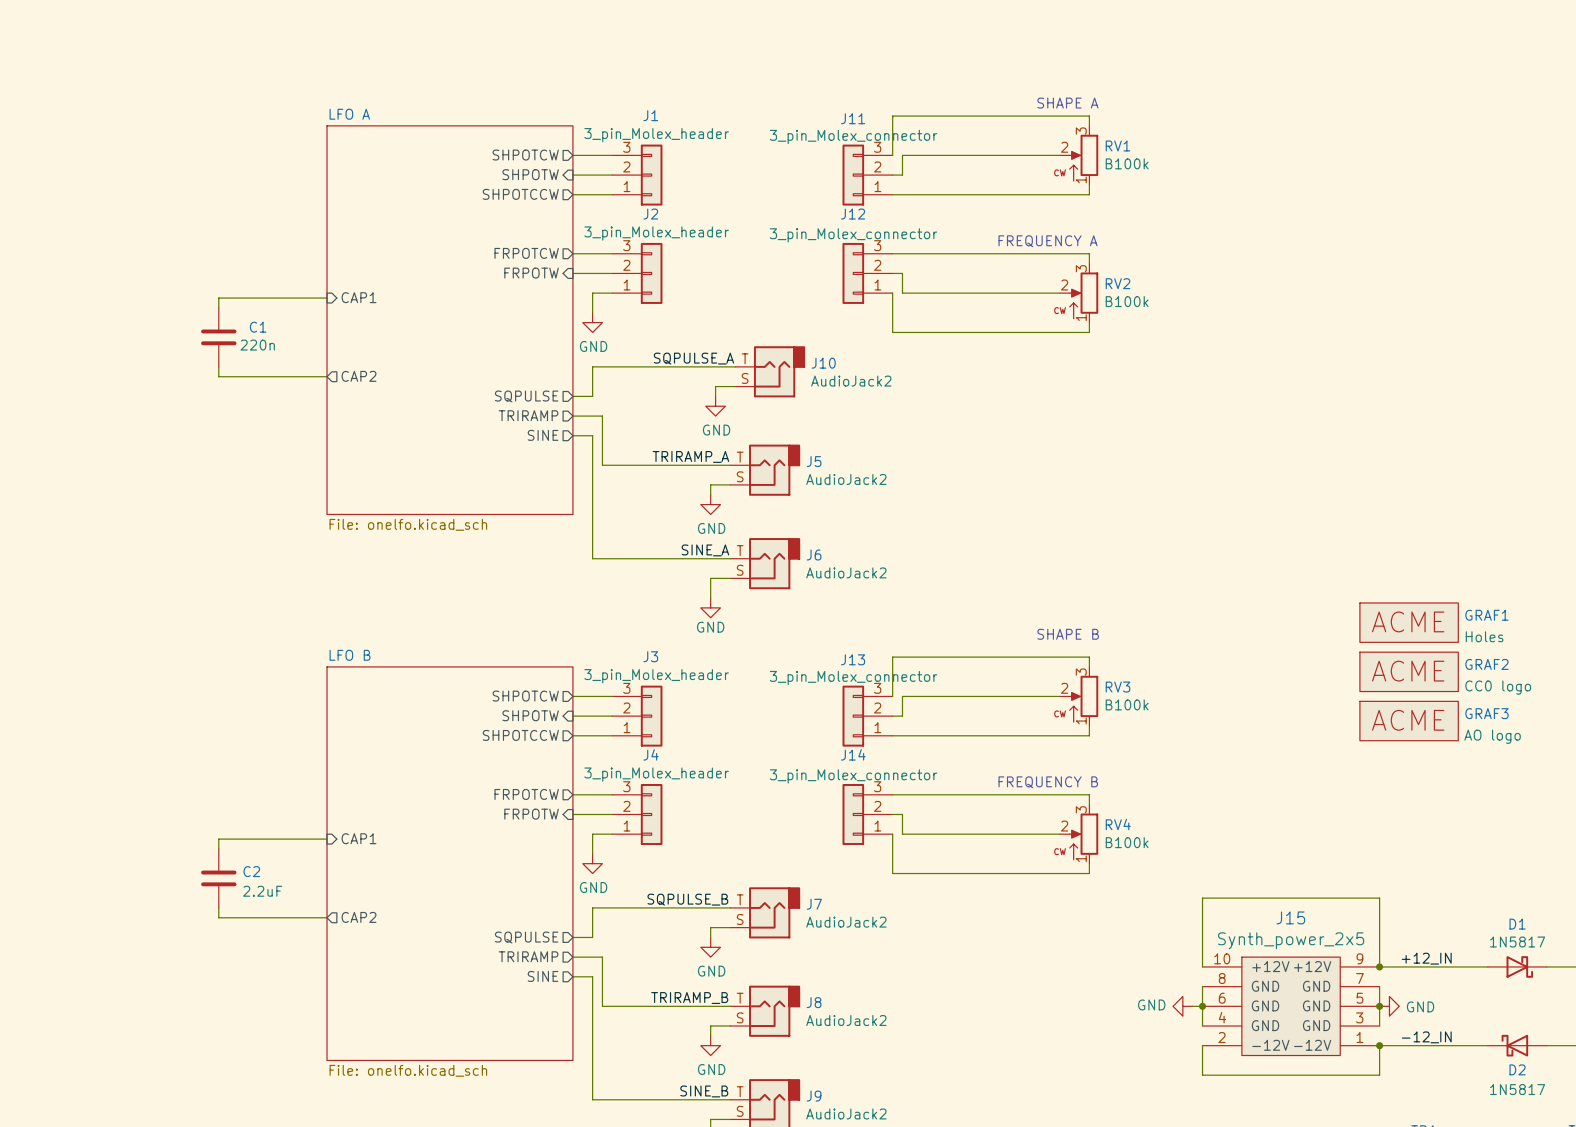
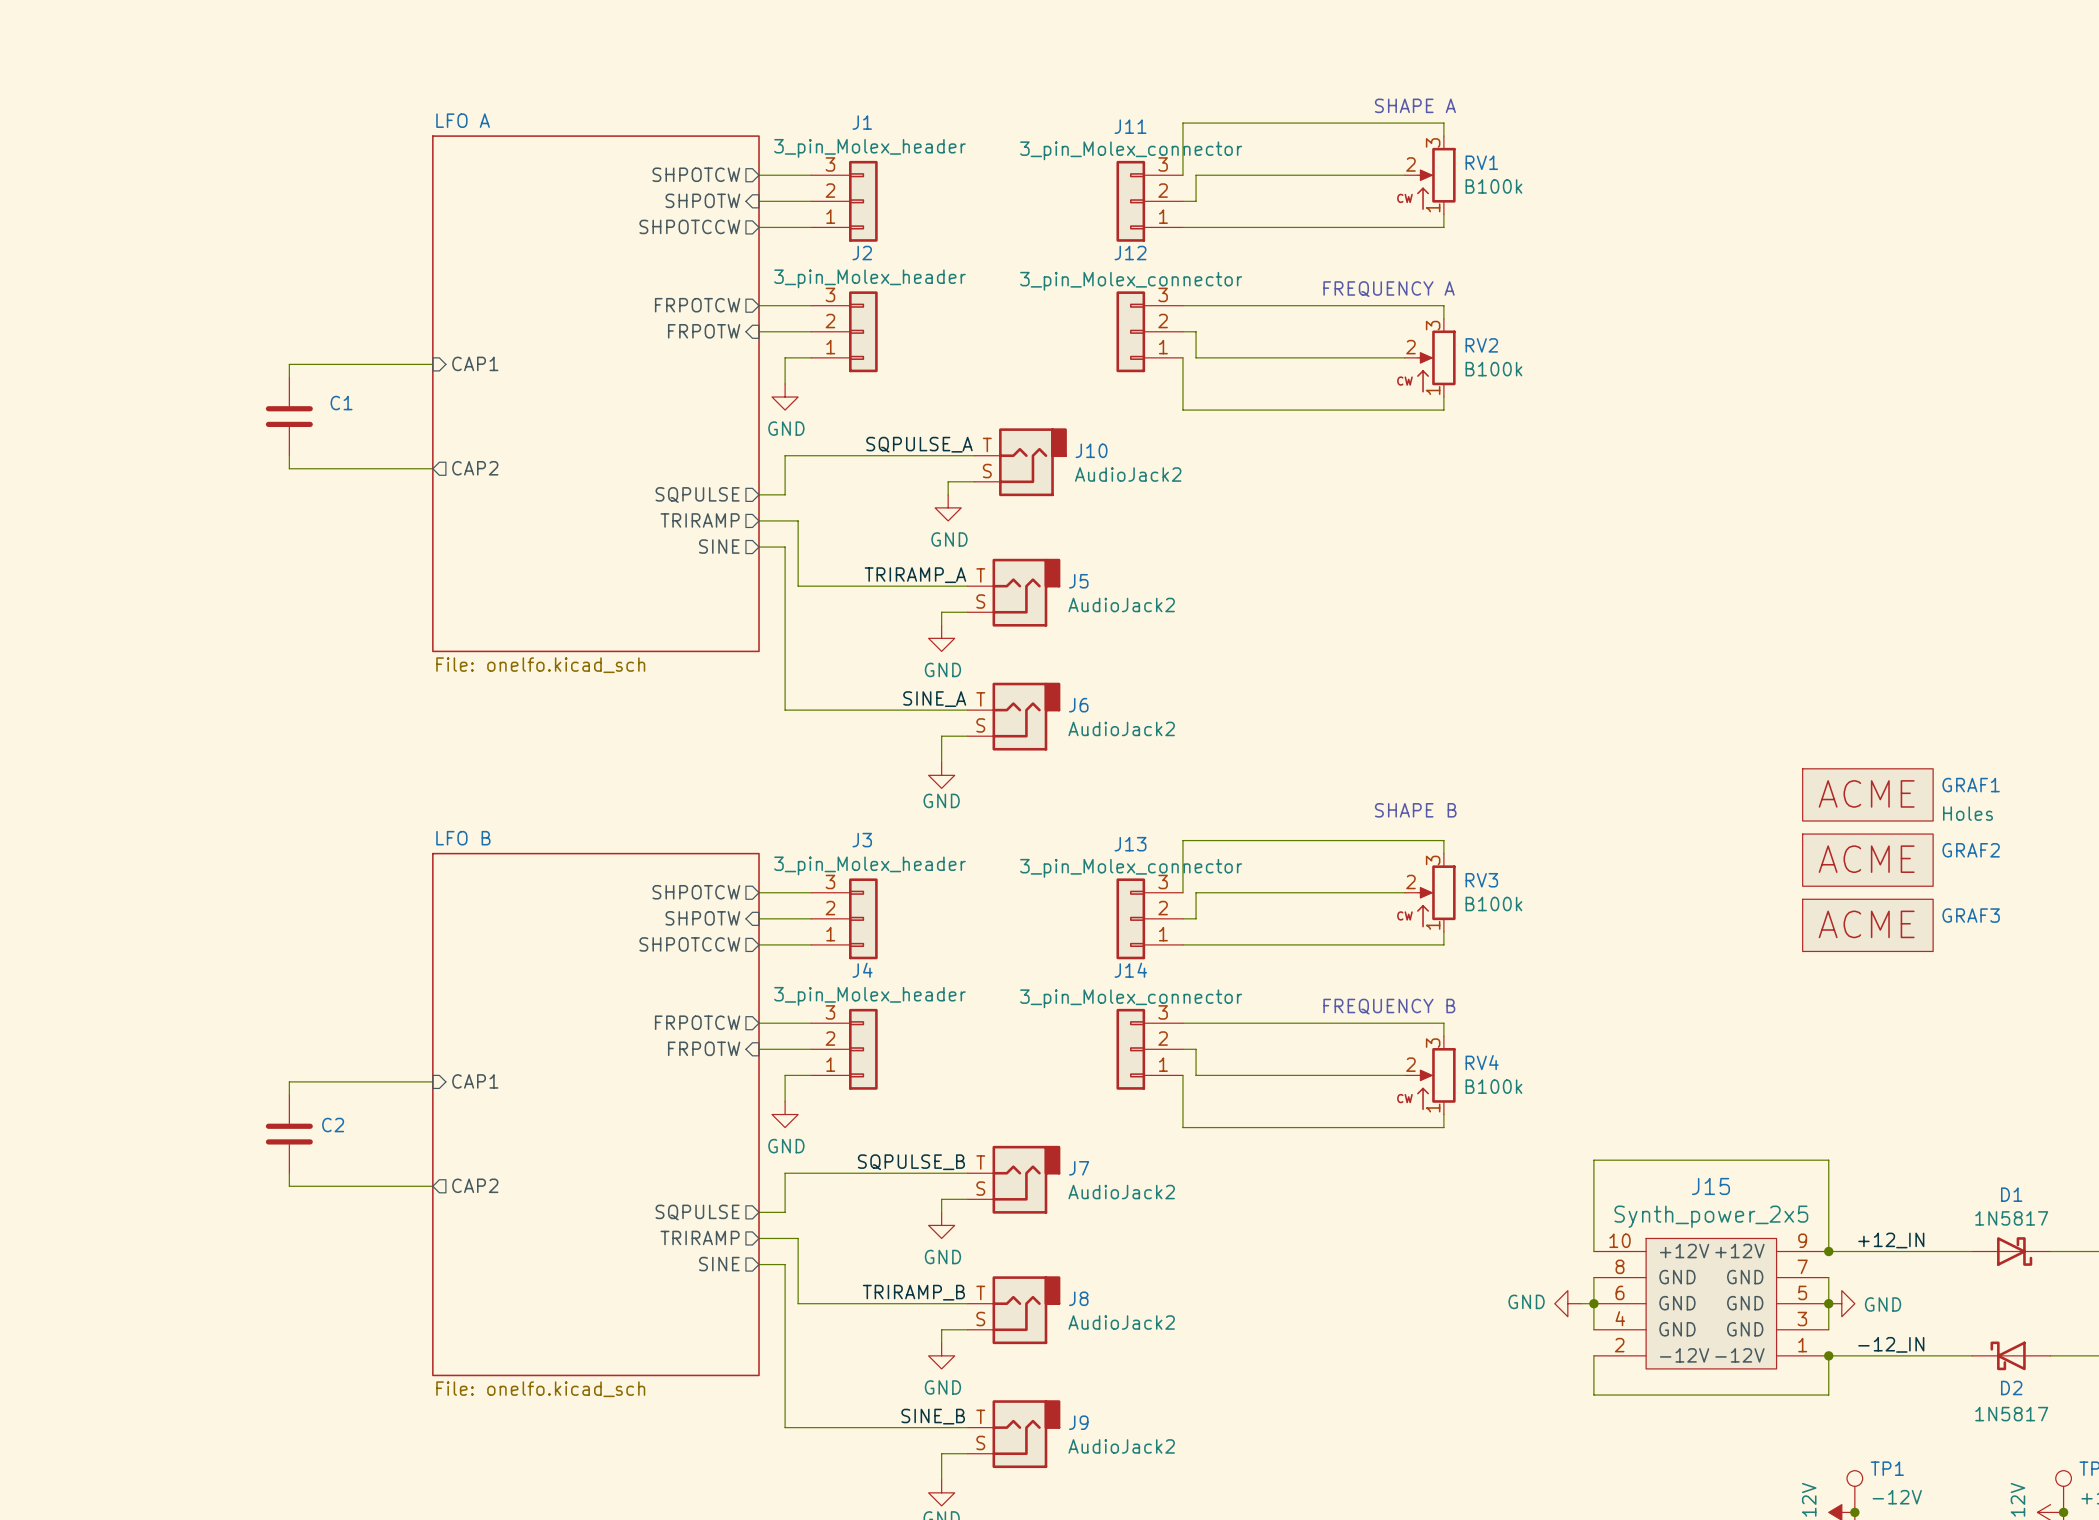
C1 value: 220n (257, 345) -> none
GRAF2 value: CC0 logo (1498, 687) -> none
GRAF3 value: AO logo (1492, 736) -> none
C2 value: 2.2uF (262, 891) -> none

